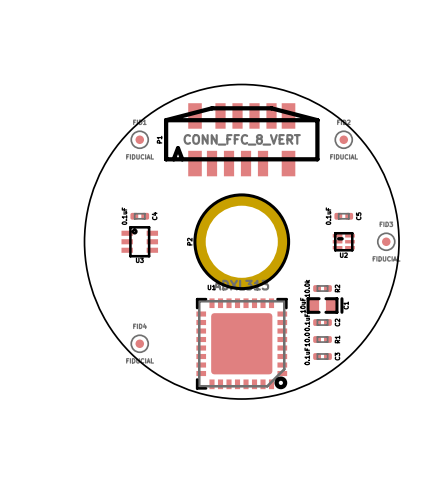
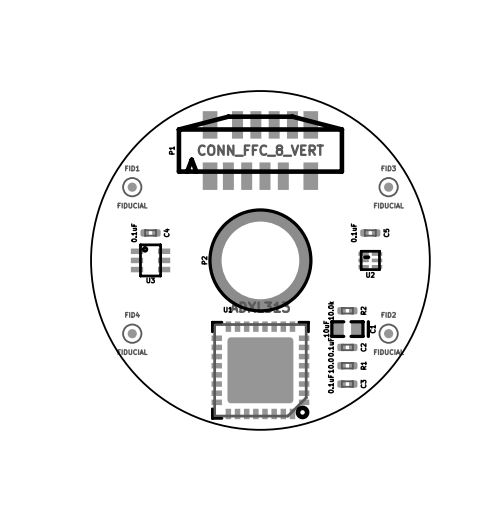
part position: (139, 139) -> (132, 187)
part position: (343, 139) -> (388, 333)
part position: (386, 241) -> (388, 187)
part position: (139, 343) -> (132, 333)

